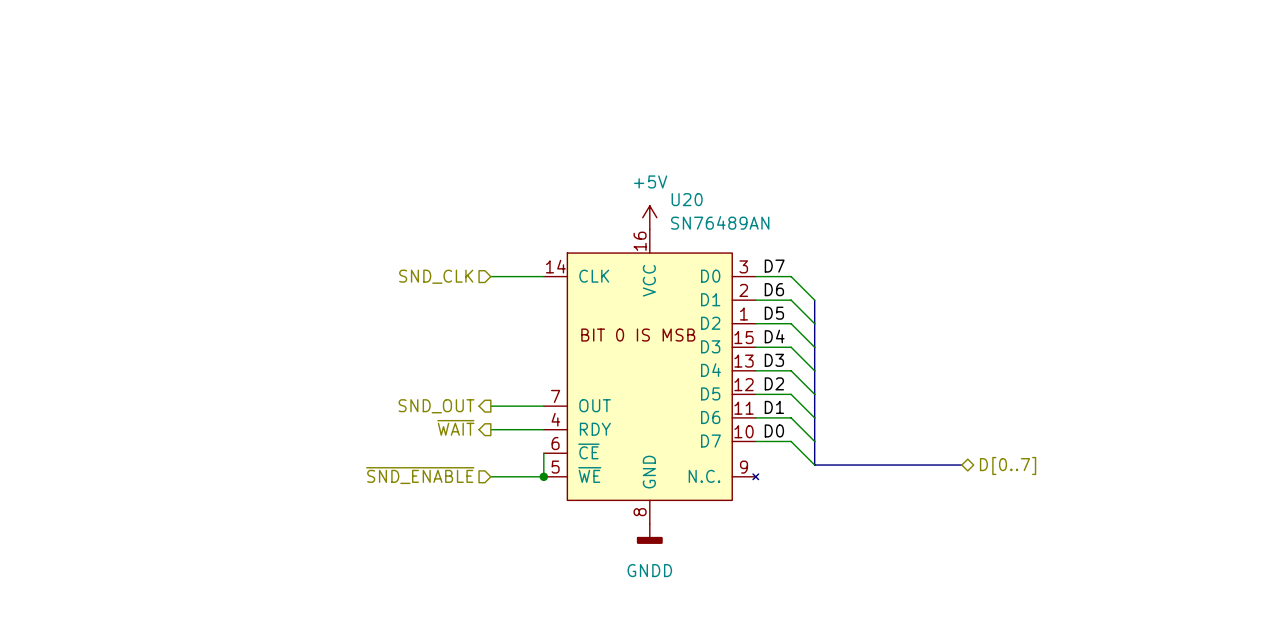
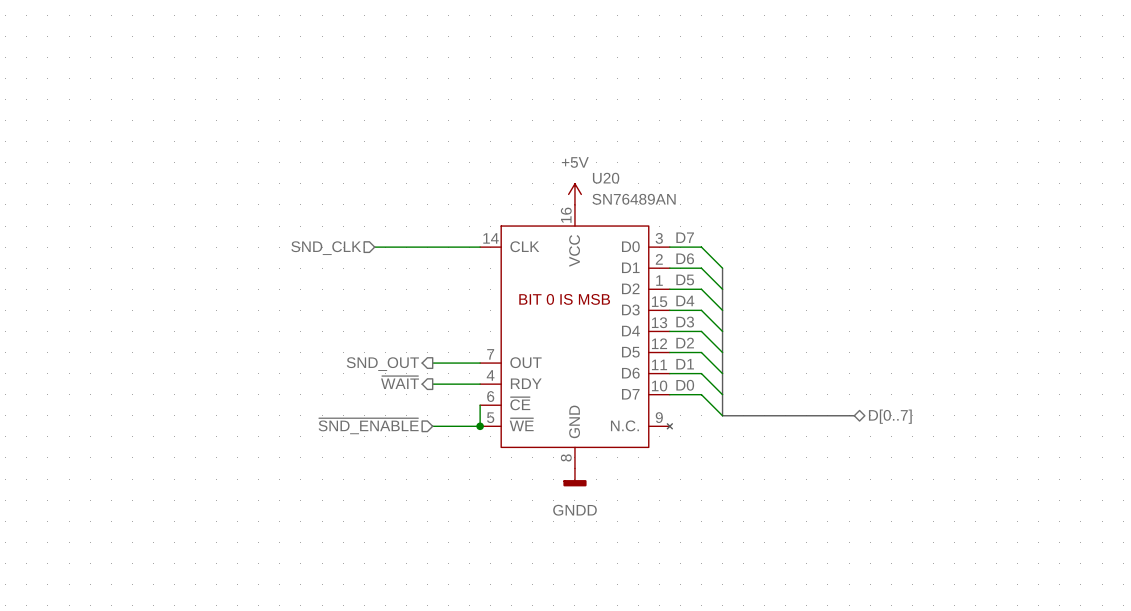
wire: none -> (374, 247) (432, 247)
hierarchical label position: SND_CLK (436, 276) -> SND_CLK (326, 248)

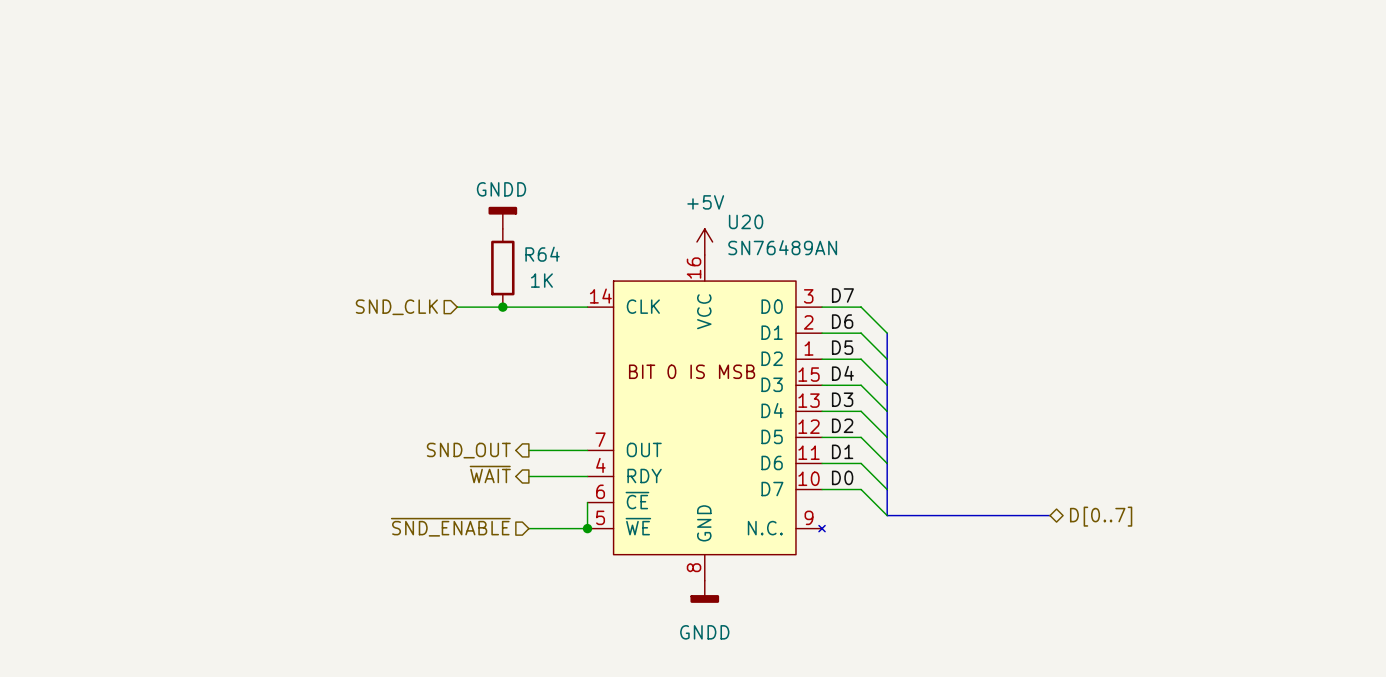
power symbol: none -> GNDD (502, 217)
R64: none -> 1K (502, 268)
junction: none -> (502, 307)

